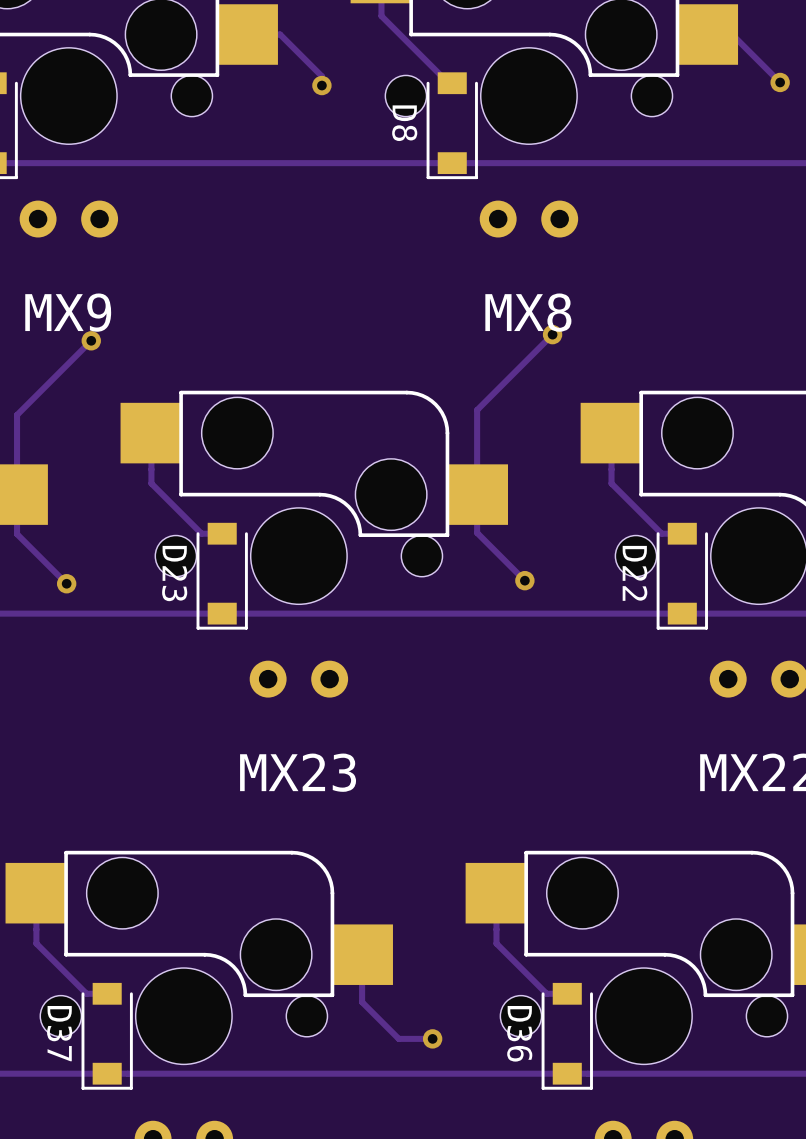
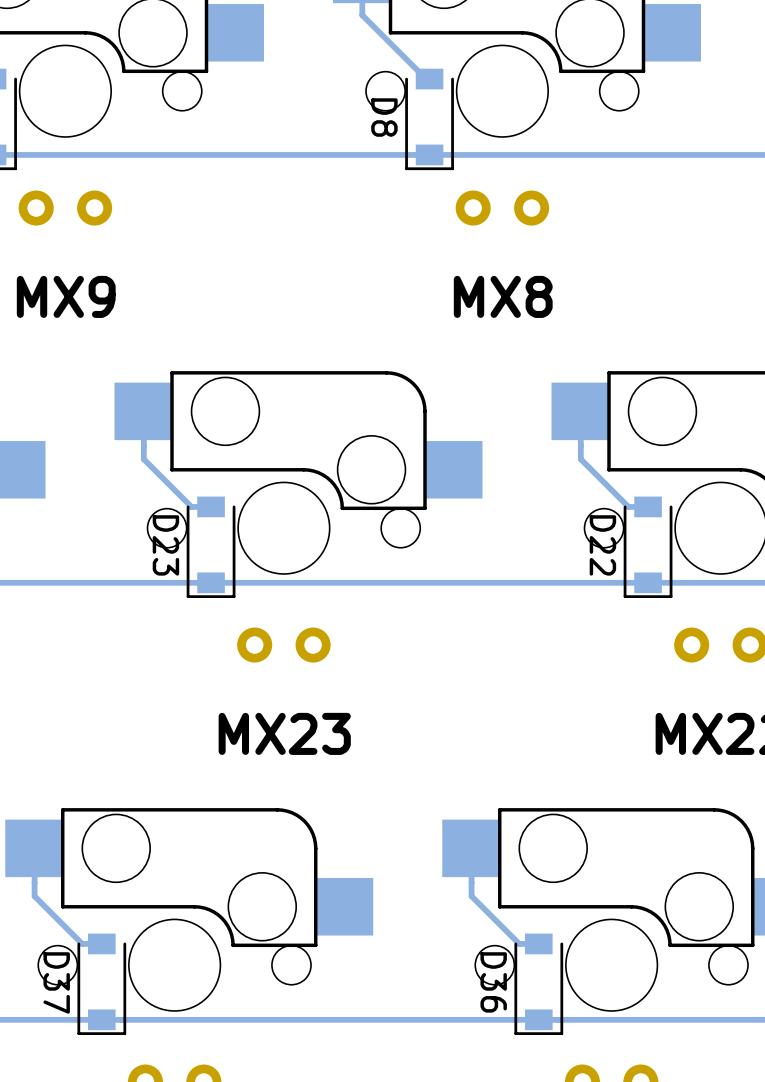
track: (247, 34) (280, 34) (321, 76) (321, 85) -> none
track: (707, 34) (732, 34) (780, 82) -> none
via: (780, 82) -> none
via: (321, 85) -> none
track: (552, 334) (477, 410) (477, 532) (524, 580) -> none
via: (552, 334) -> none
track: (91, 340) (17, 415) (17, 534) (66, 583) -> none
via: (91, 340) -> none
via: (524, 580) -> none
via: (66, 583) -> none
track: (362, 954) (362, 1002) (398, 1038) (432, 1038) -> none
via: (432, 1038) -> none

